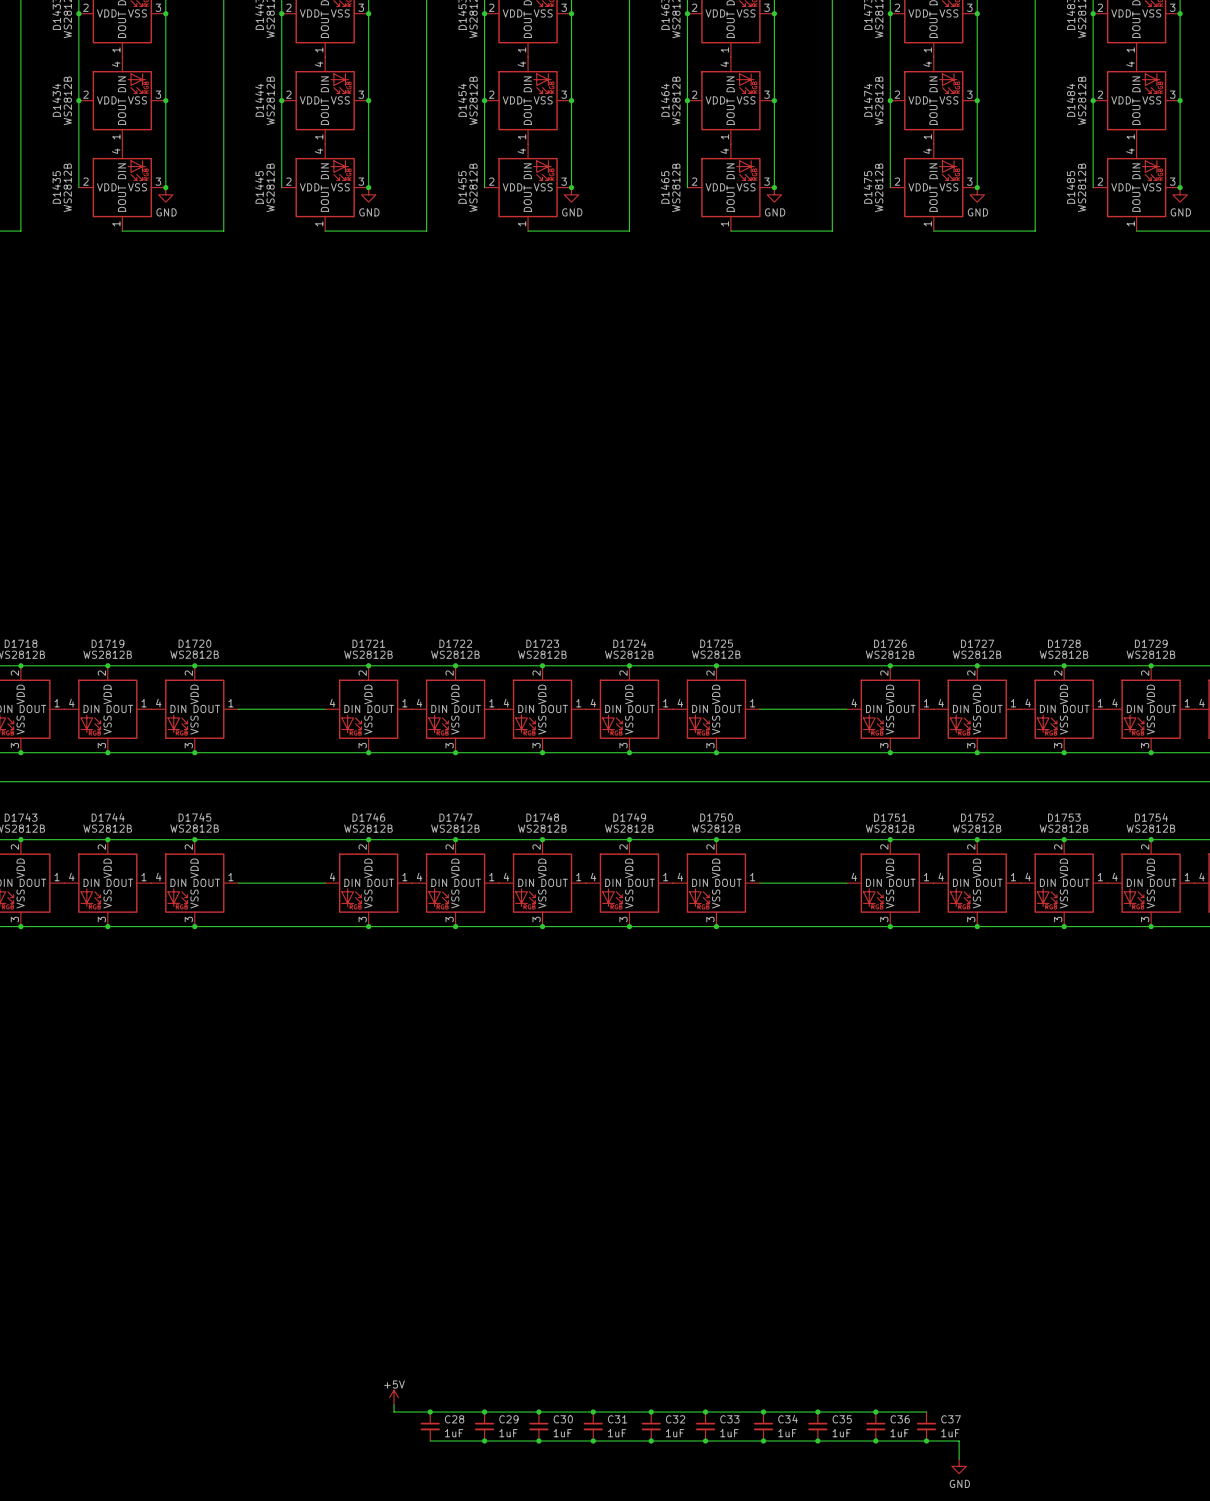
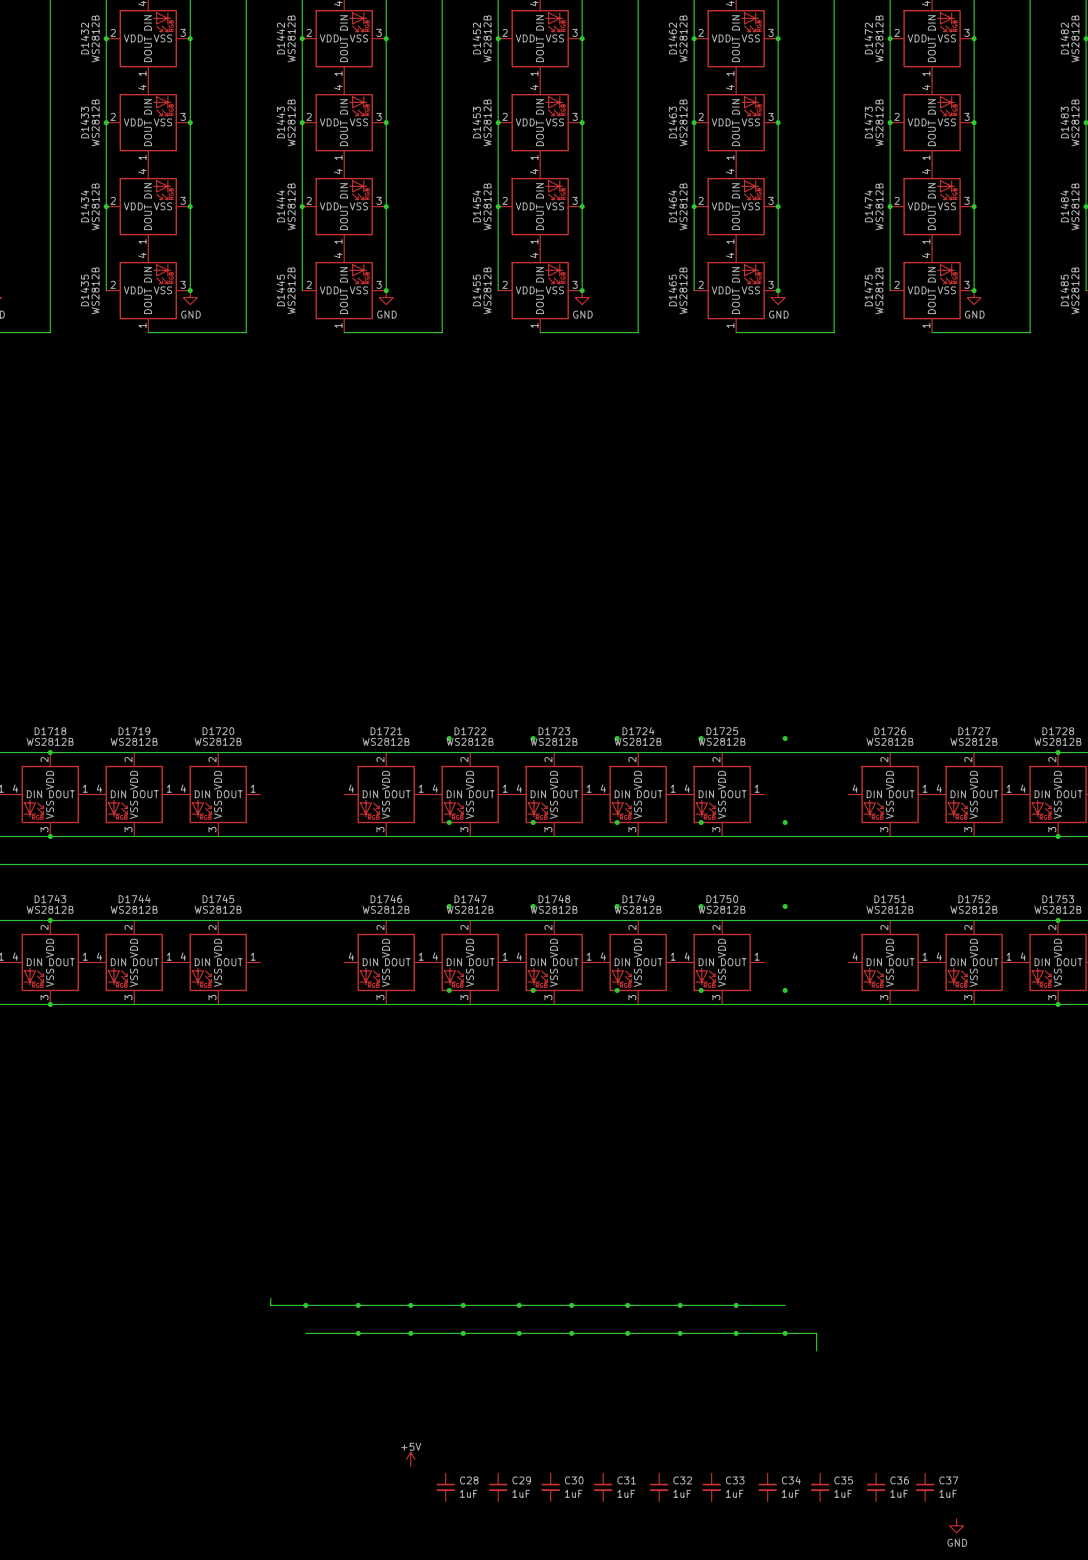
junction: none -> (785, 738)
junction: (107, 665) -> none
junction: (194, 665) -> none
junction: (368, 665) -> none
junction position: (455, 665) -> (449, 738)
junction position: (542, 665) -> (533, 738)
junction position: (629, 665) -> (617, 738)
junction position: (716, 665) -> (701, 738)
junction: (890, 665) -> none
junction: (977, 665) -> none
wire: (238, 709) (325, 709) -> none
wire: (759, 709) (846, 709) -> none
junction: none -> (785, 822)
junction: (107, 752) -> none
junction: (194, 752) -> none
junction: (368, 752) -> none
junction position: (455, 752) -> (449, 822)
junction position: (542, 752) -> (533, 822)
junction position: (629, 752) -> (617, 822)
junction position: (716, 752) -> (701, 822)
junction: (890, 752) -> none
junction: (977, 752) -> none
junction: none -> (785, 906)
junction: (107, 839) -> none
junction: (194, 839) -> none
junction: (368, 839) -> none
junction position: (455, 839) -> (449, 906)
junction position: (542, 839) -> (533, 906)
junction position: (629, 839) -> (617, 906)
junction position: (716, 839) -> (701, 906)
junction: (890, 839) -> none
junction: (977, 839) -> none
wire: (238, 883) (325, 883) -> none
wire: (759, 883) (846, 883) -> none
junction: none -> (785, 990)
junction: (107, 926) -> none
junction: (194, 926) -> none
junction: (368, 926) -> none
junction position: (455, 926) -> (449, 990)
junction position: (542, 926) -> (533, 990)
junction position: (629, 926) -> (617, 990)
junction position: (716, 926) -> (701, 990)
junction: (890, 926) -> none
junction: (977, 926) -> none
wire: none -> (270, 1298) (270, 1305) (785, 1305)
junction: none -> (305, 1305)
junction: none -> (358, 1305)
junction: none -> (410, 1305)
junction: none -> (463, 1305)
junction: none -> (519, 1305)
junction: none -> (571, 1305)
junction: none -> (627, 1305)
junction: none -> (680, 1305)
junction: none -> (736, 1305)
wire: none -> (305, 1333) (816, 1333) (816, 1350)
junction: none -> (358, 1333)
junction: none -> (410, 1333)
junction: none -> (463, 1333)
junction: none -> (519, 1333)
junction: none -> (571, 1333)
junction: none -> (627, 1333)
junction: none -> (680, 1333)
junction: none -> (736, 1333)
junction: none -> (785, 1333)
wire: (394, 1404) (394, 1412) (926, 1412) -> none
junction: (430, 1412) -> none
junction: (484, 1412) -> none
junction: (538, 1412) -> none
junction: (593, 1412) -> none
junction: (651, 1412) -> none
junction: (705, 1412) -> none
junction: (763, 1412) -> none
junction: (817, 1412) -> none
junction: (875, 1412) -> none
wire: (430, 1440) (959, 1440) (959, 1459) -> none
junction: (484, 1440) -> none
junction: (538, 1440) -> none
junction: (593, 1440) -> none
junction: (651, 1440) -> none
junction: (705, 1440) -> none
junction: (763, 1440) -> none
junction: (817, 1440) -> none
junction: (875, 1440) -> none
junction: (926, 1440) -> none

